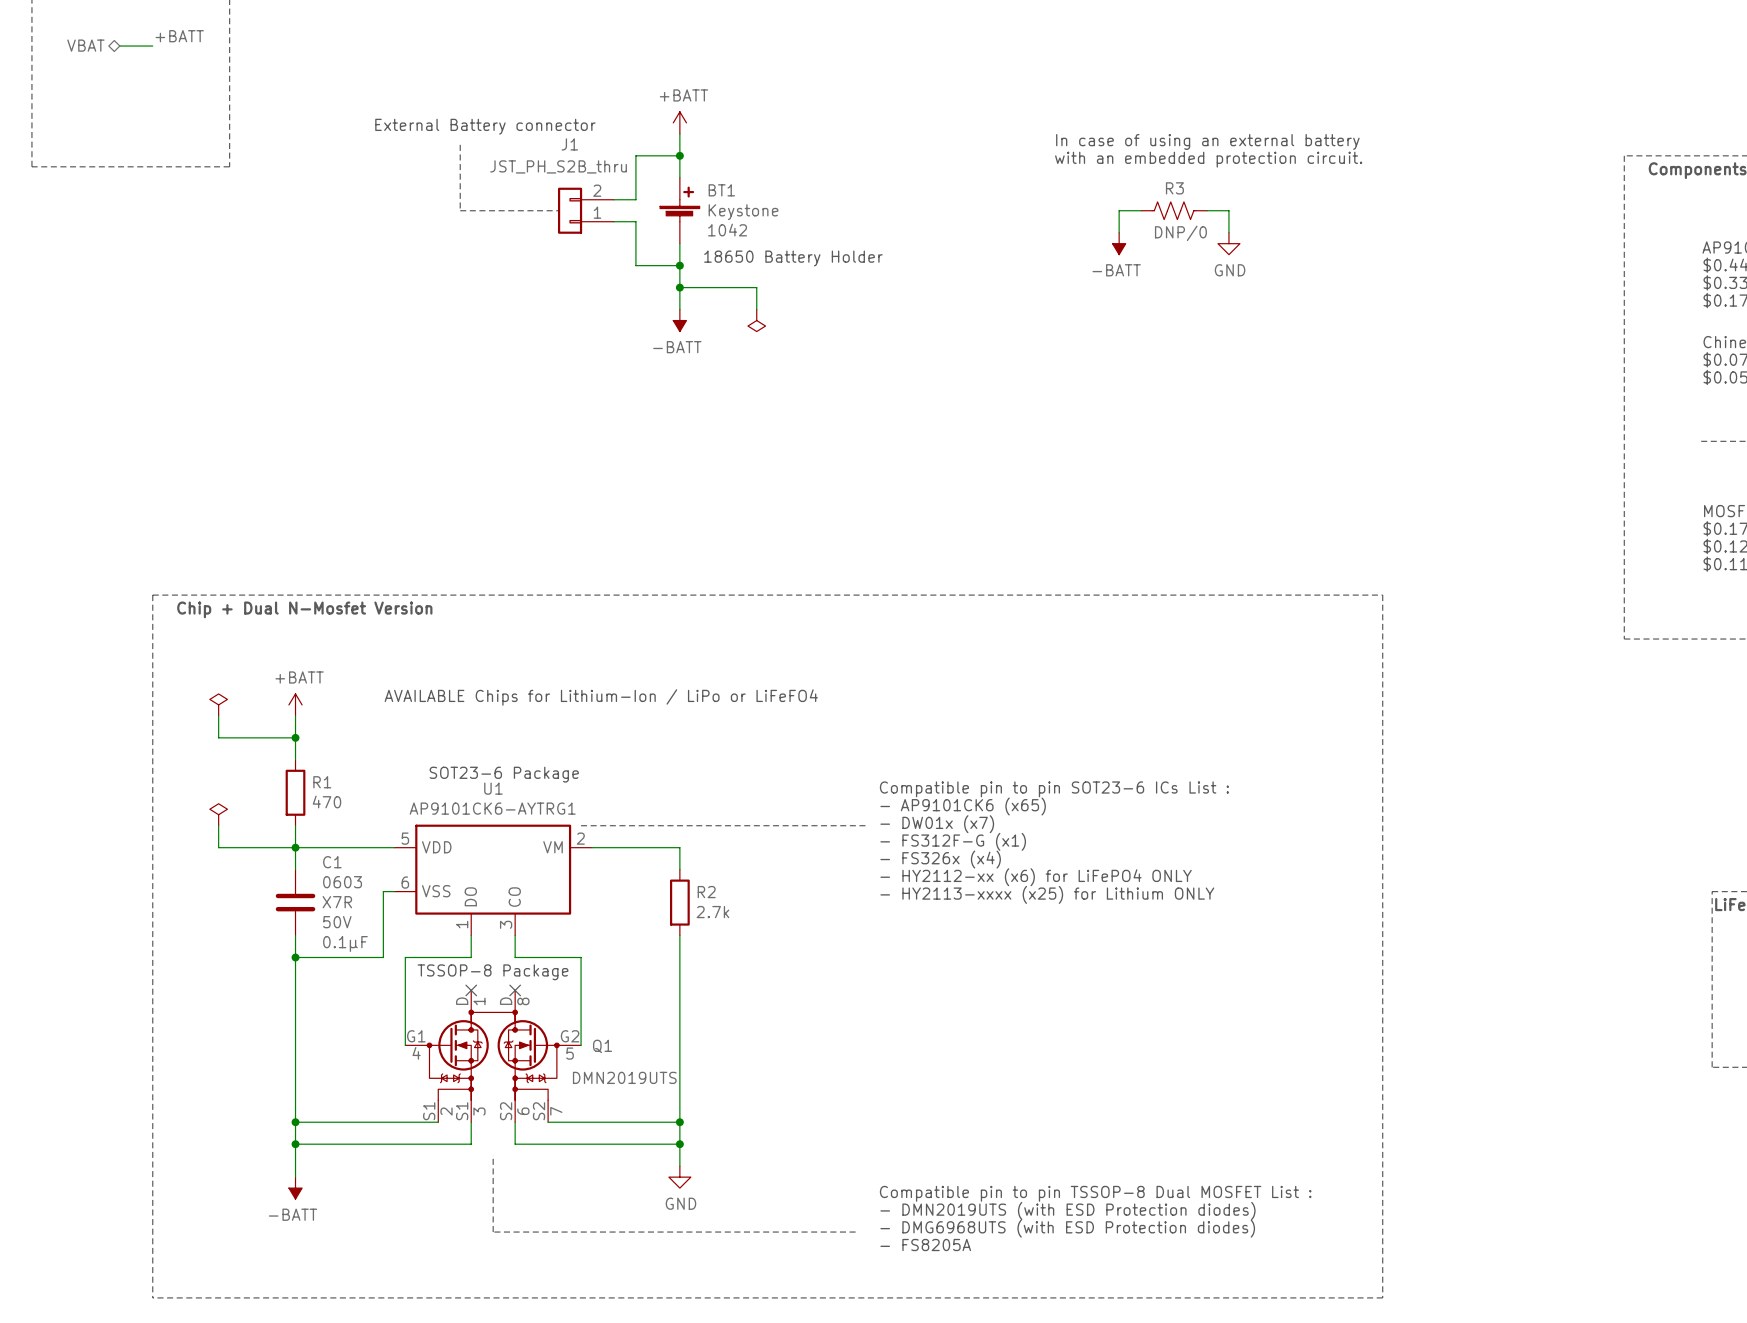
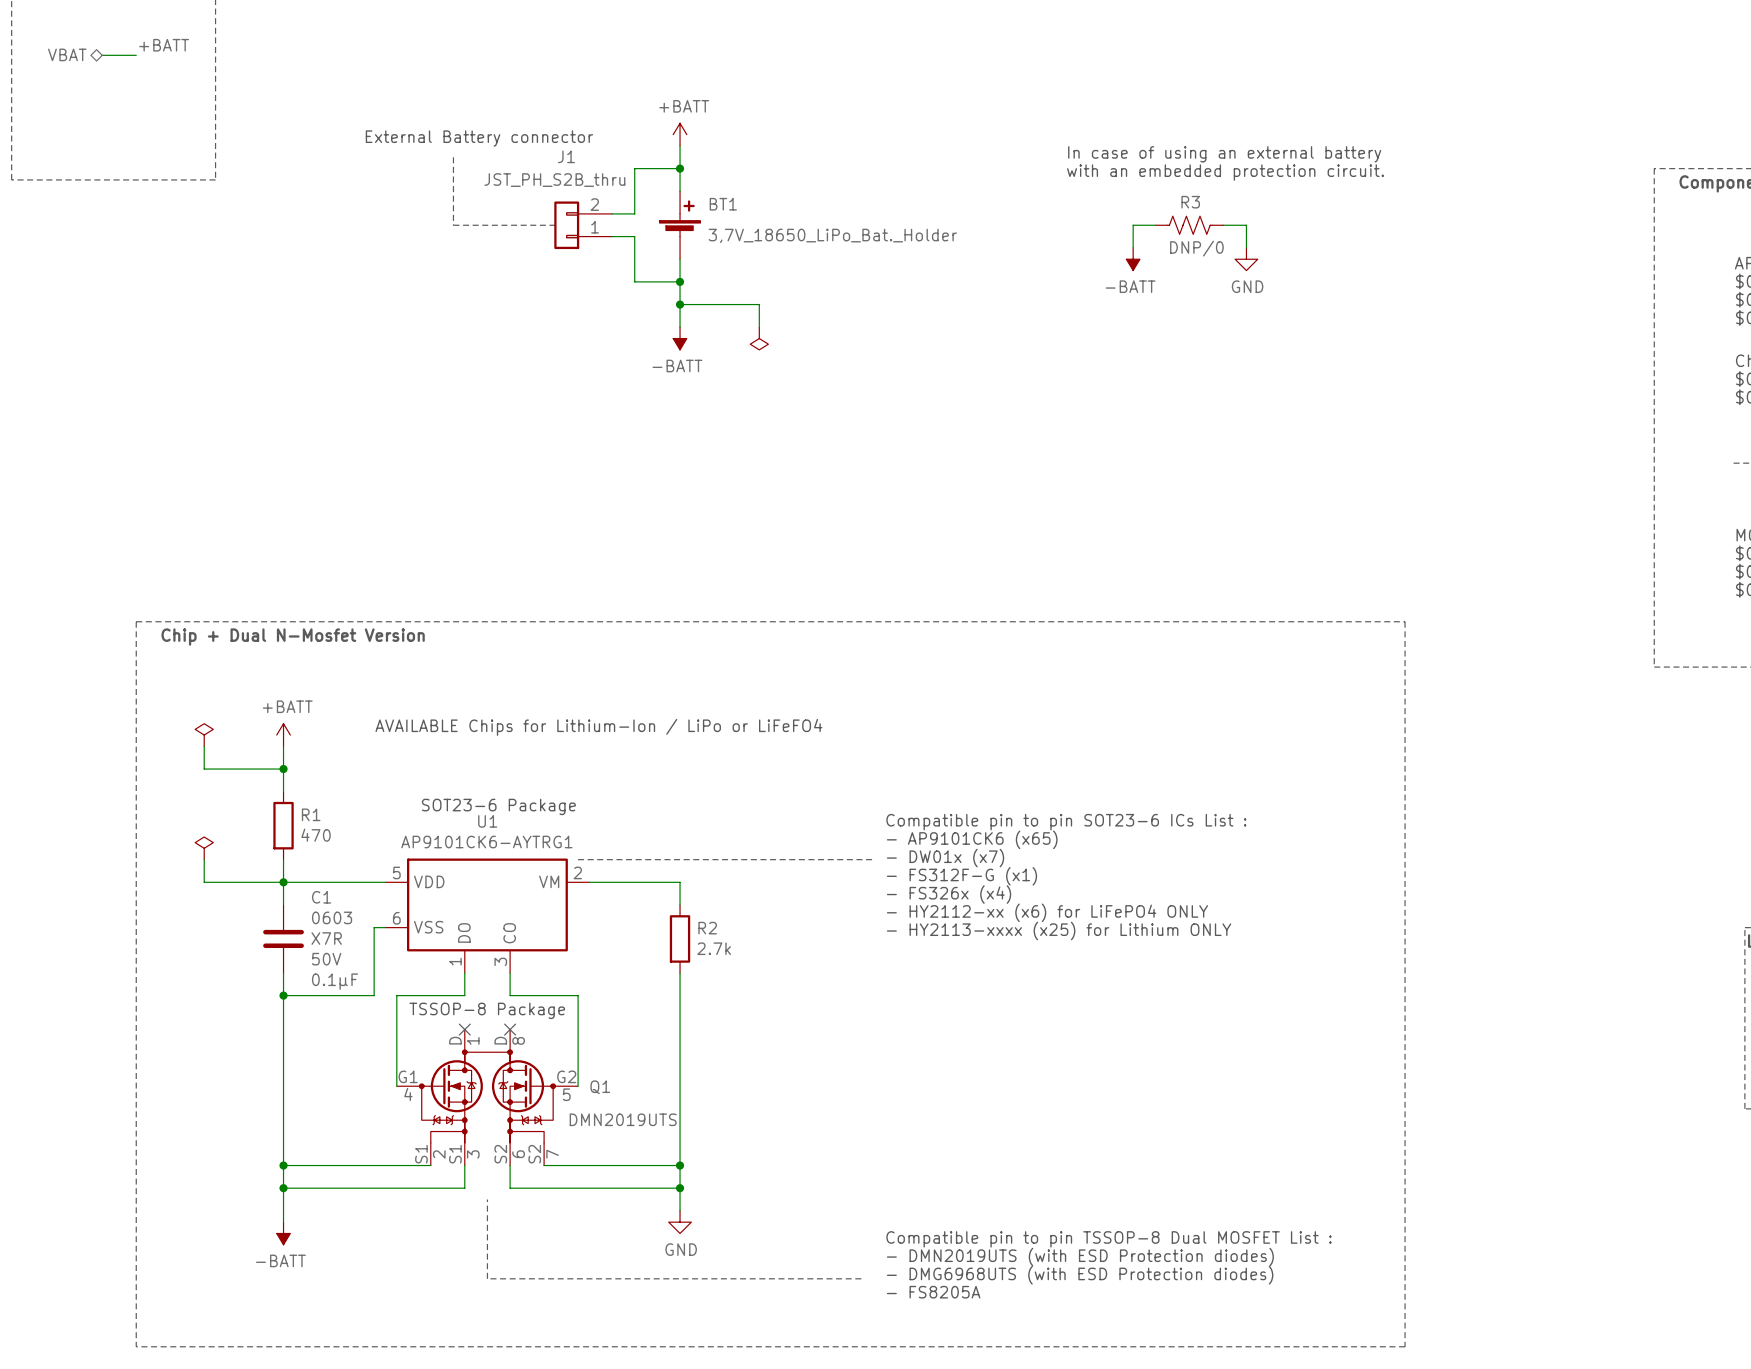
BT1 text: Keystone (743, 212) -> none
BT1 value: none -> 3,7V_18650_LiPo_Bat._Holder (832, 235)
BT1 text: 1042 (727, 230) -> none
text: 18650 Battery Holder (793, 258) -> none

